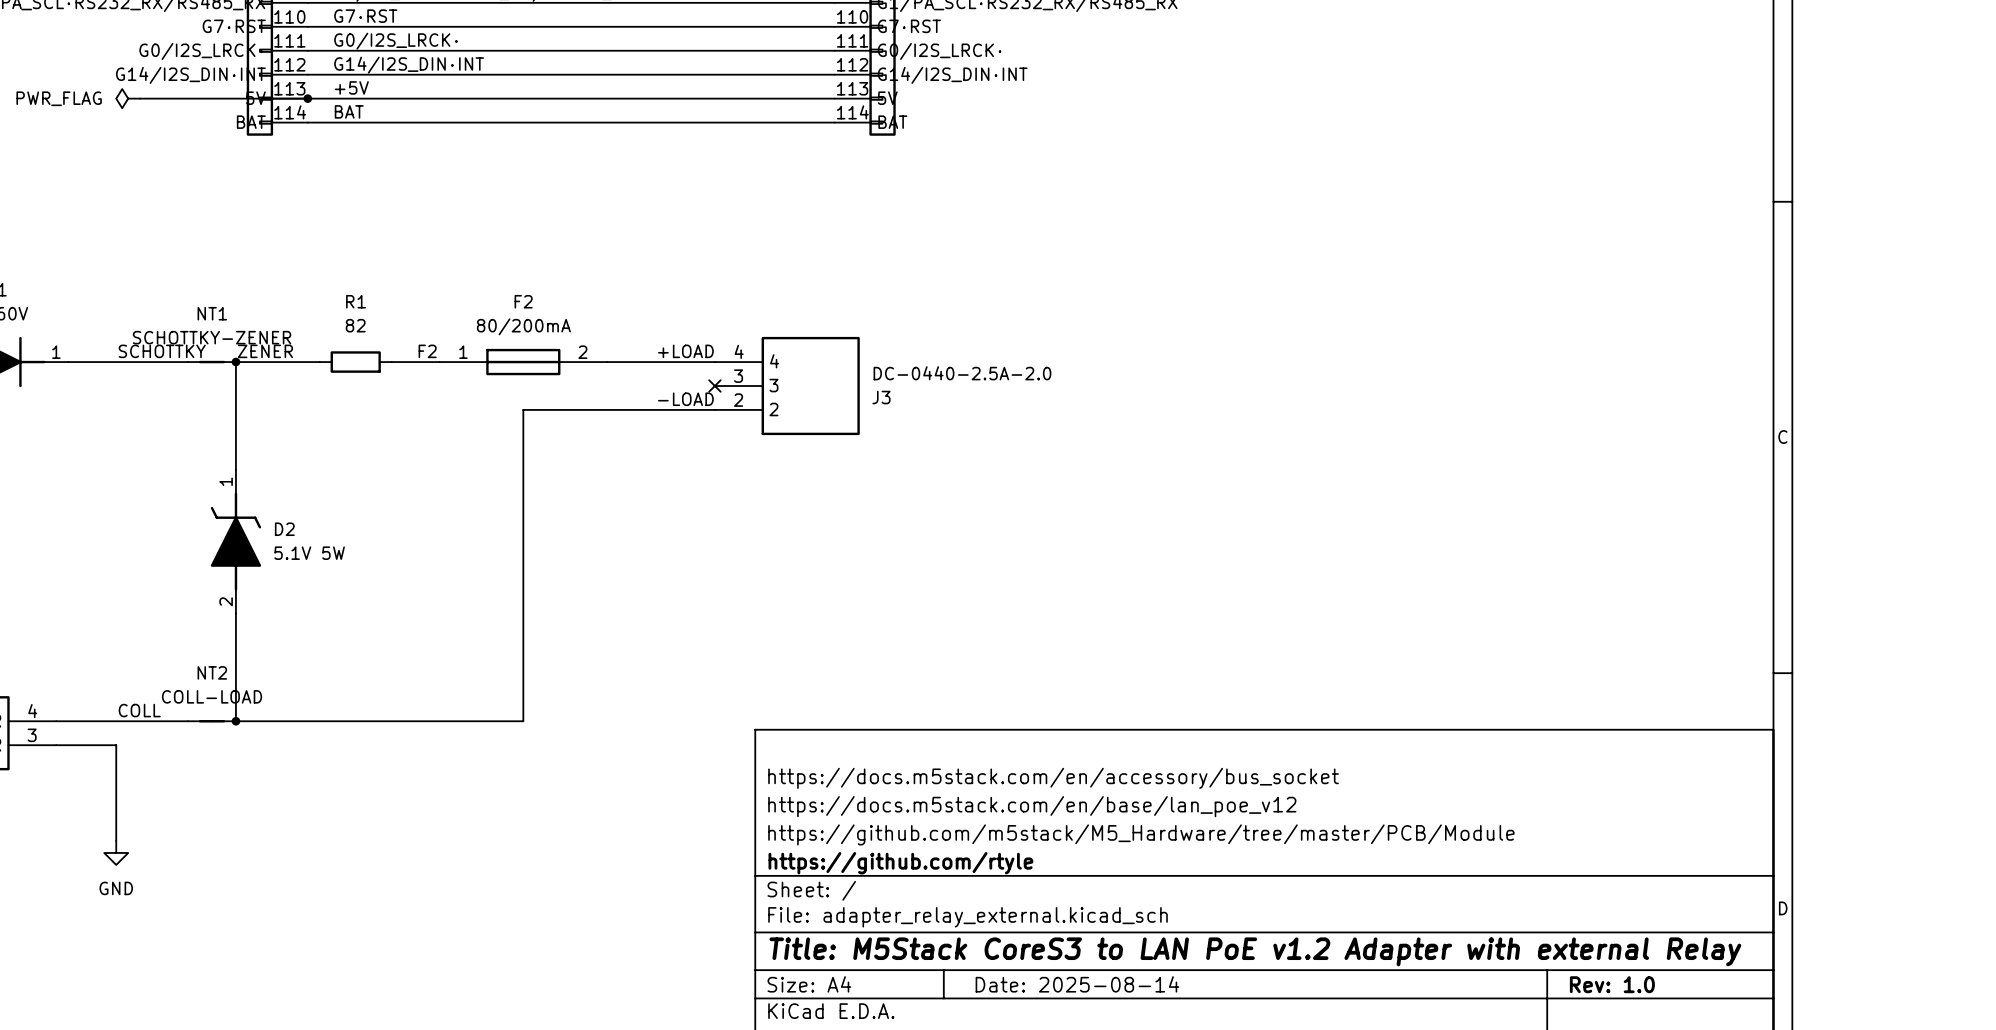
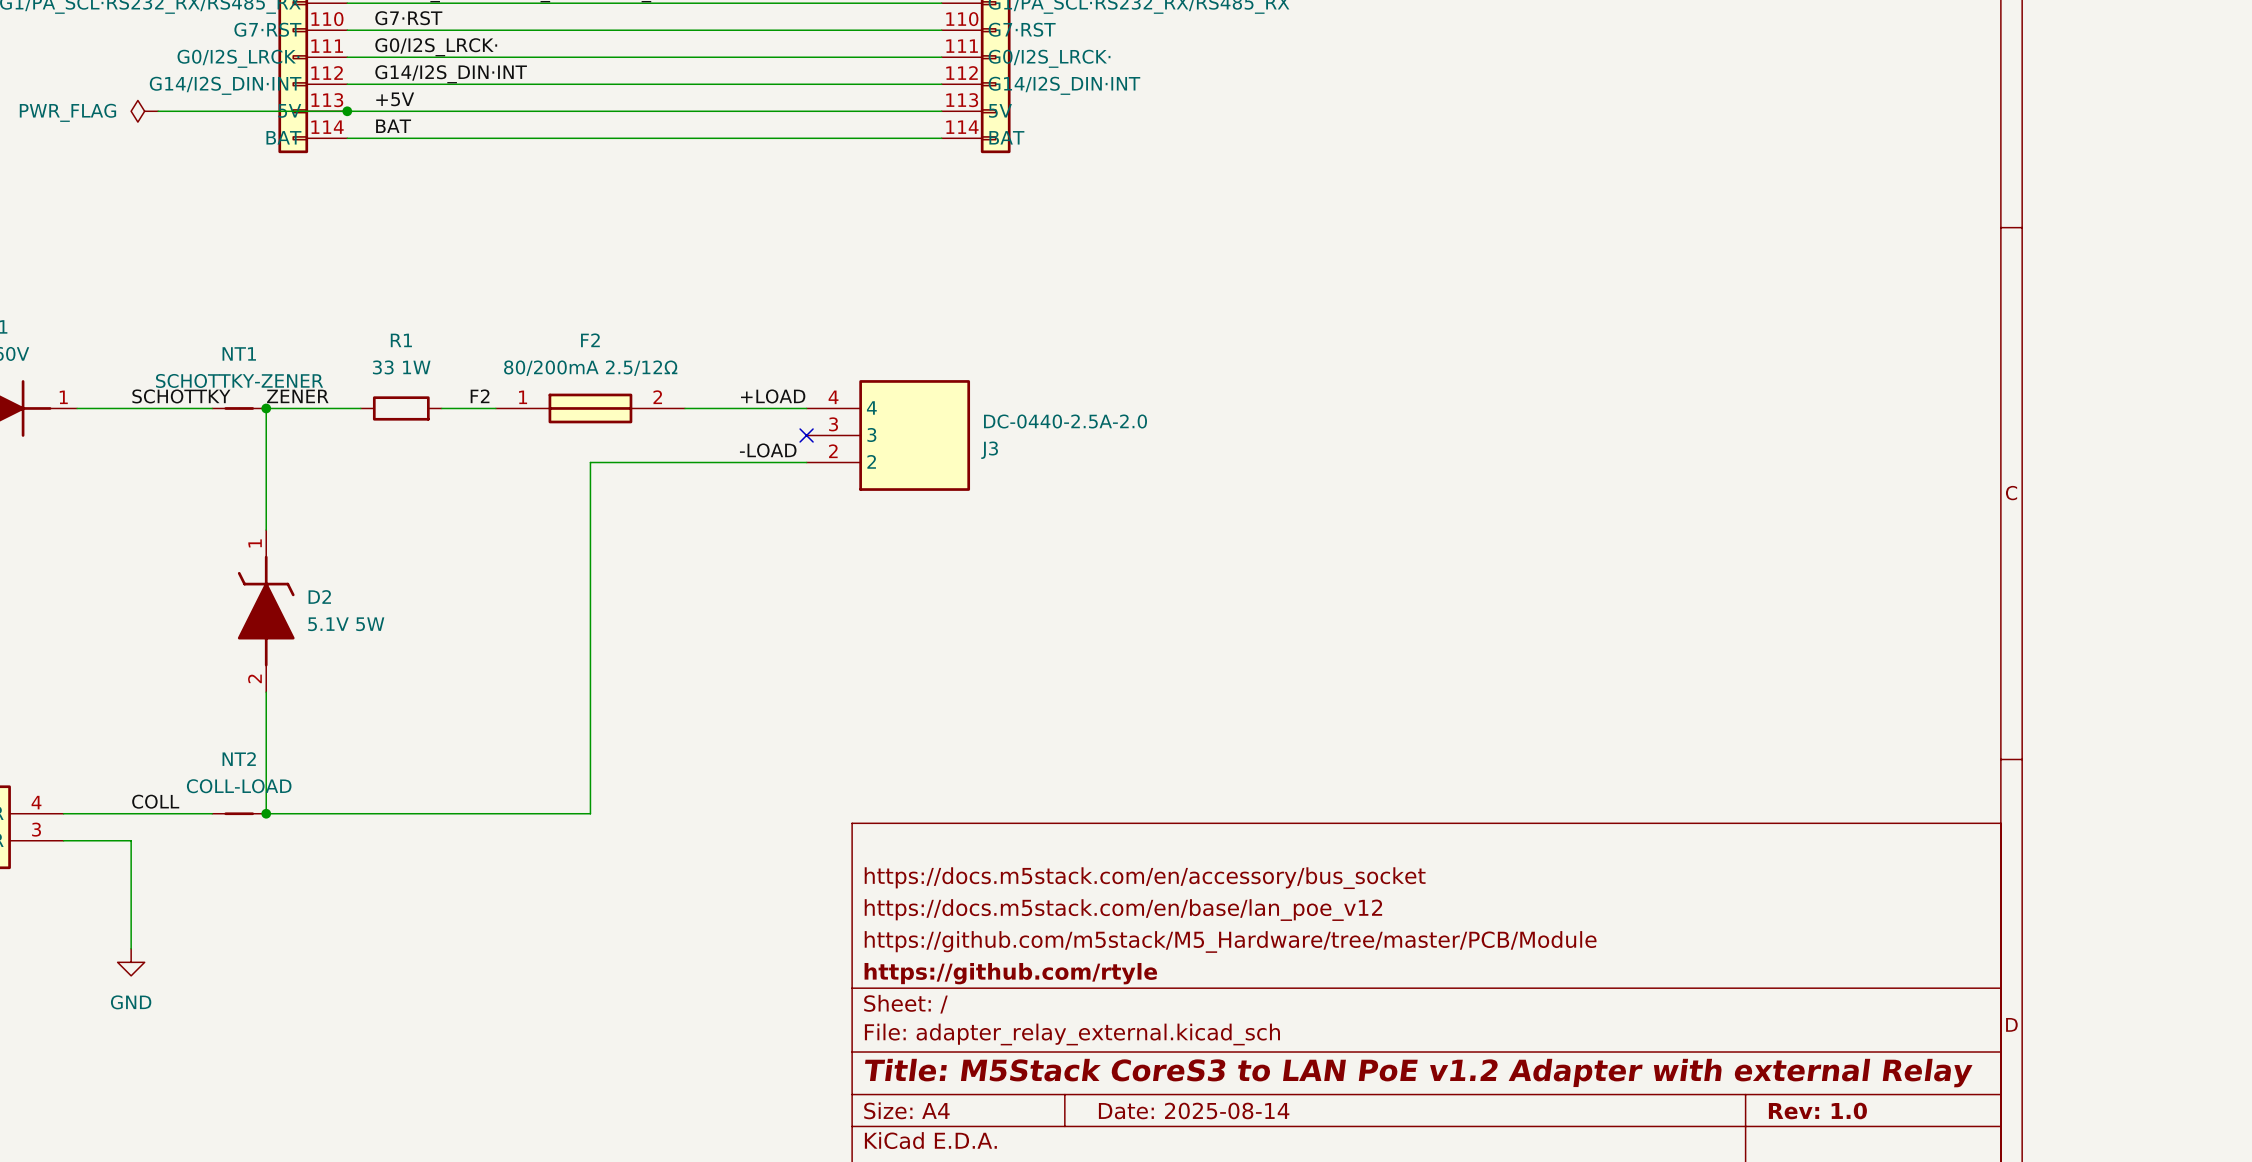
R1 value: 82 (355, 325) -> 33 1W (401, 367)
F2 value: 80/200mA (523, 326) -> 80/200mA 2.5/12Ω (590, 368)

